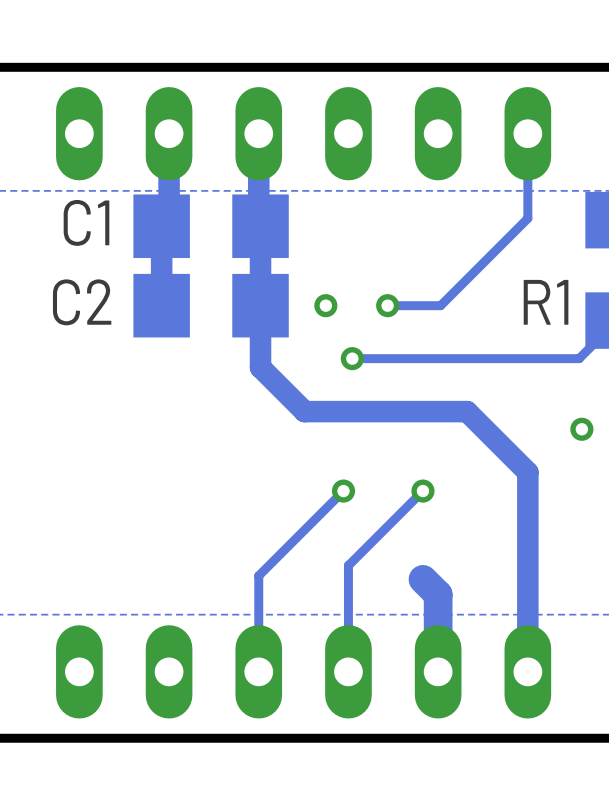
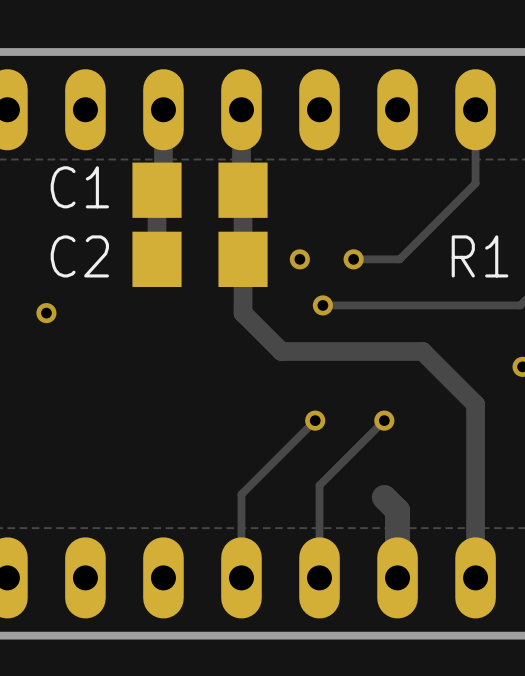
via: none -> (46, 313)

